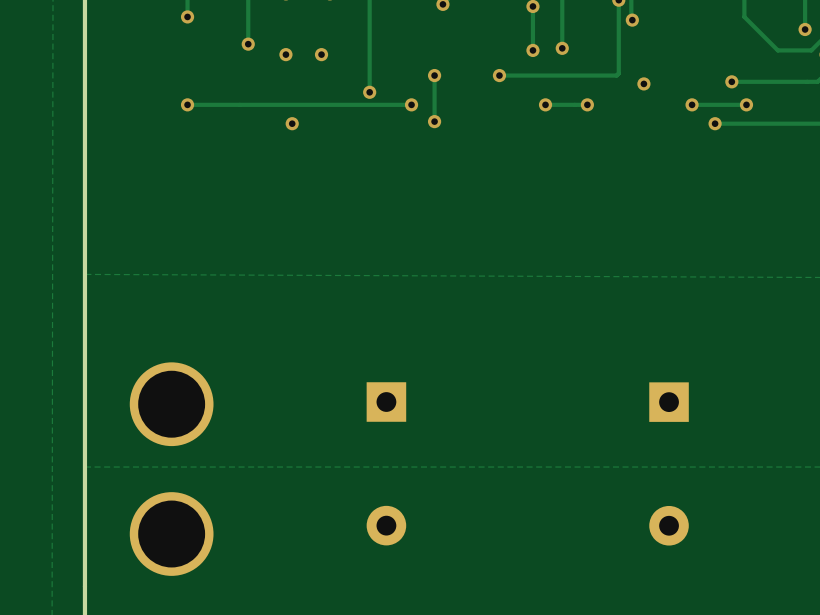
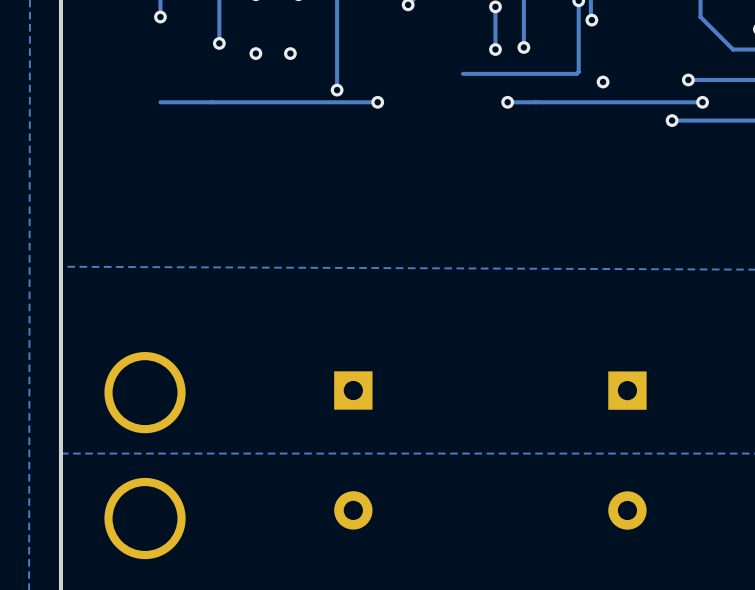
track: (434, 75) (434, 121) -> none
via: (434, 75) -> none
via: (499, 75) -> none
via: (187, 104) -> none
via: (587, 104) -> none
track: none -> (649, 102) (548, 102)
via: (692, 104) -> none
via: (434, 121) -> none
via: (292, 123) -> none

